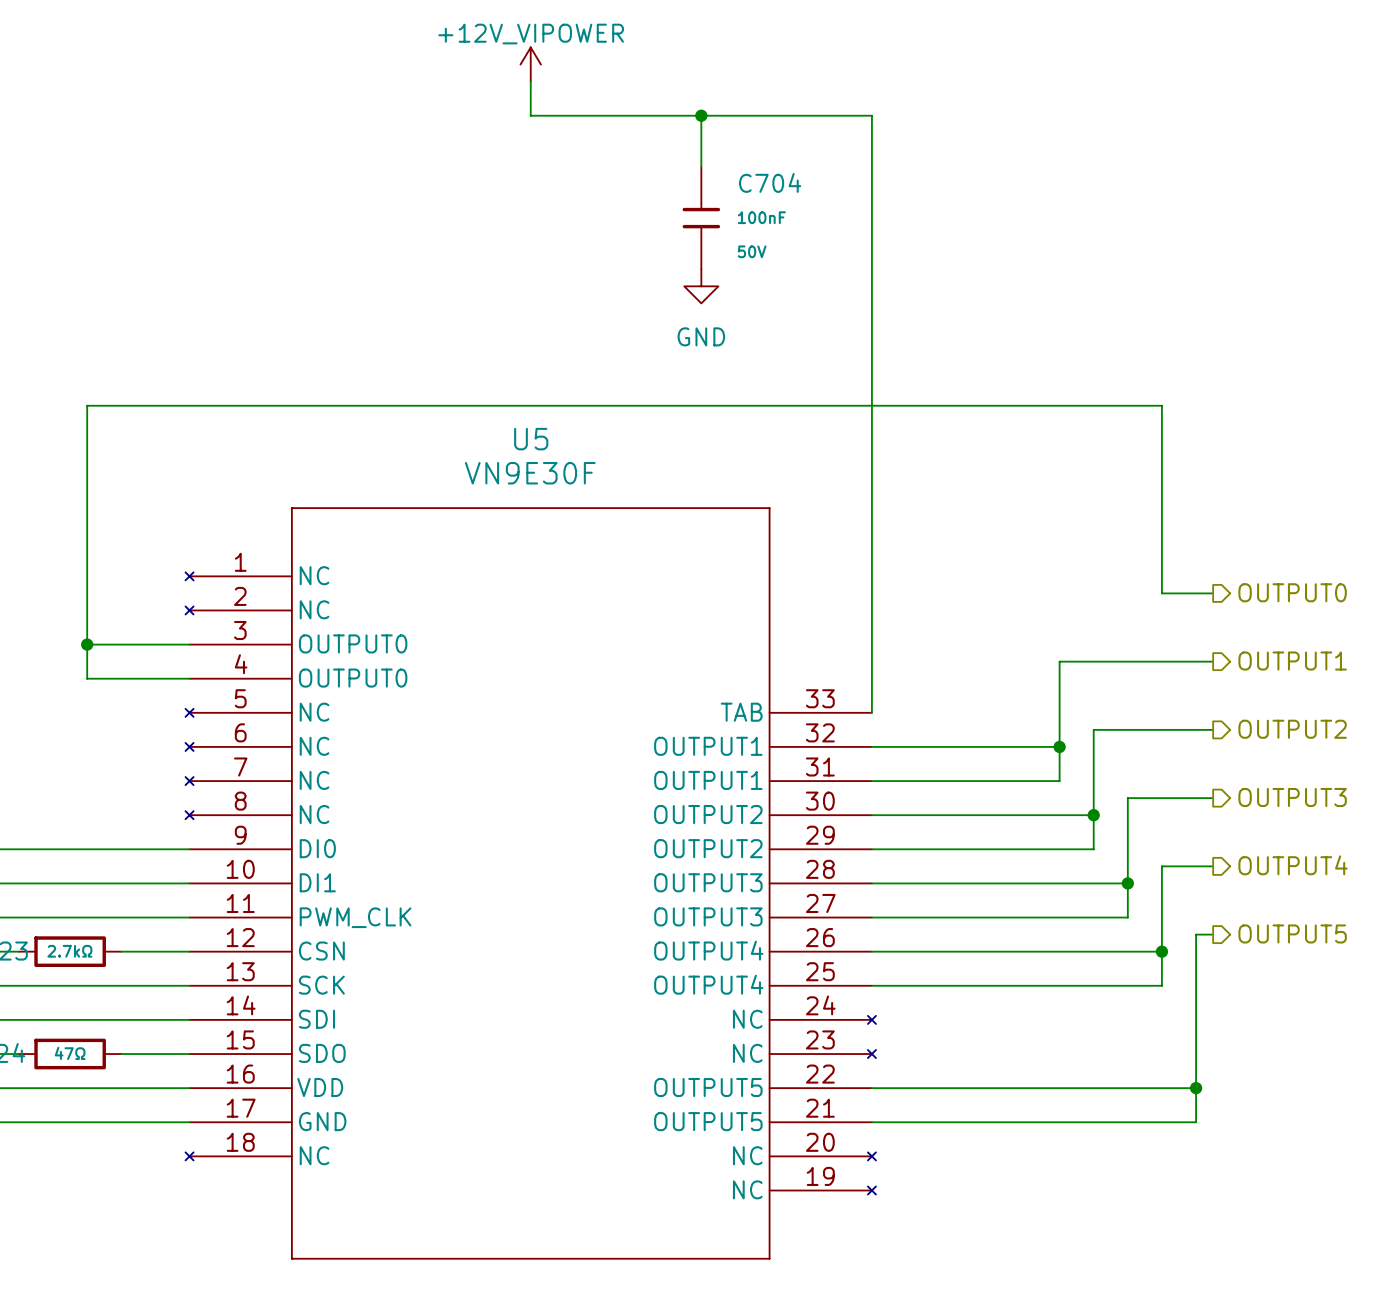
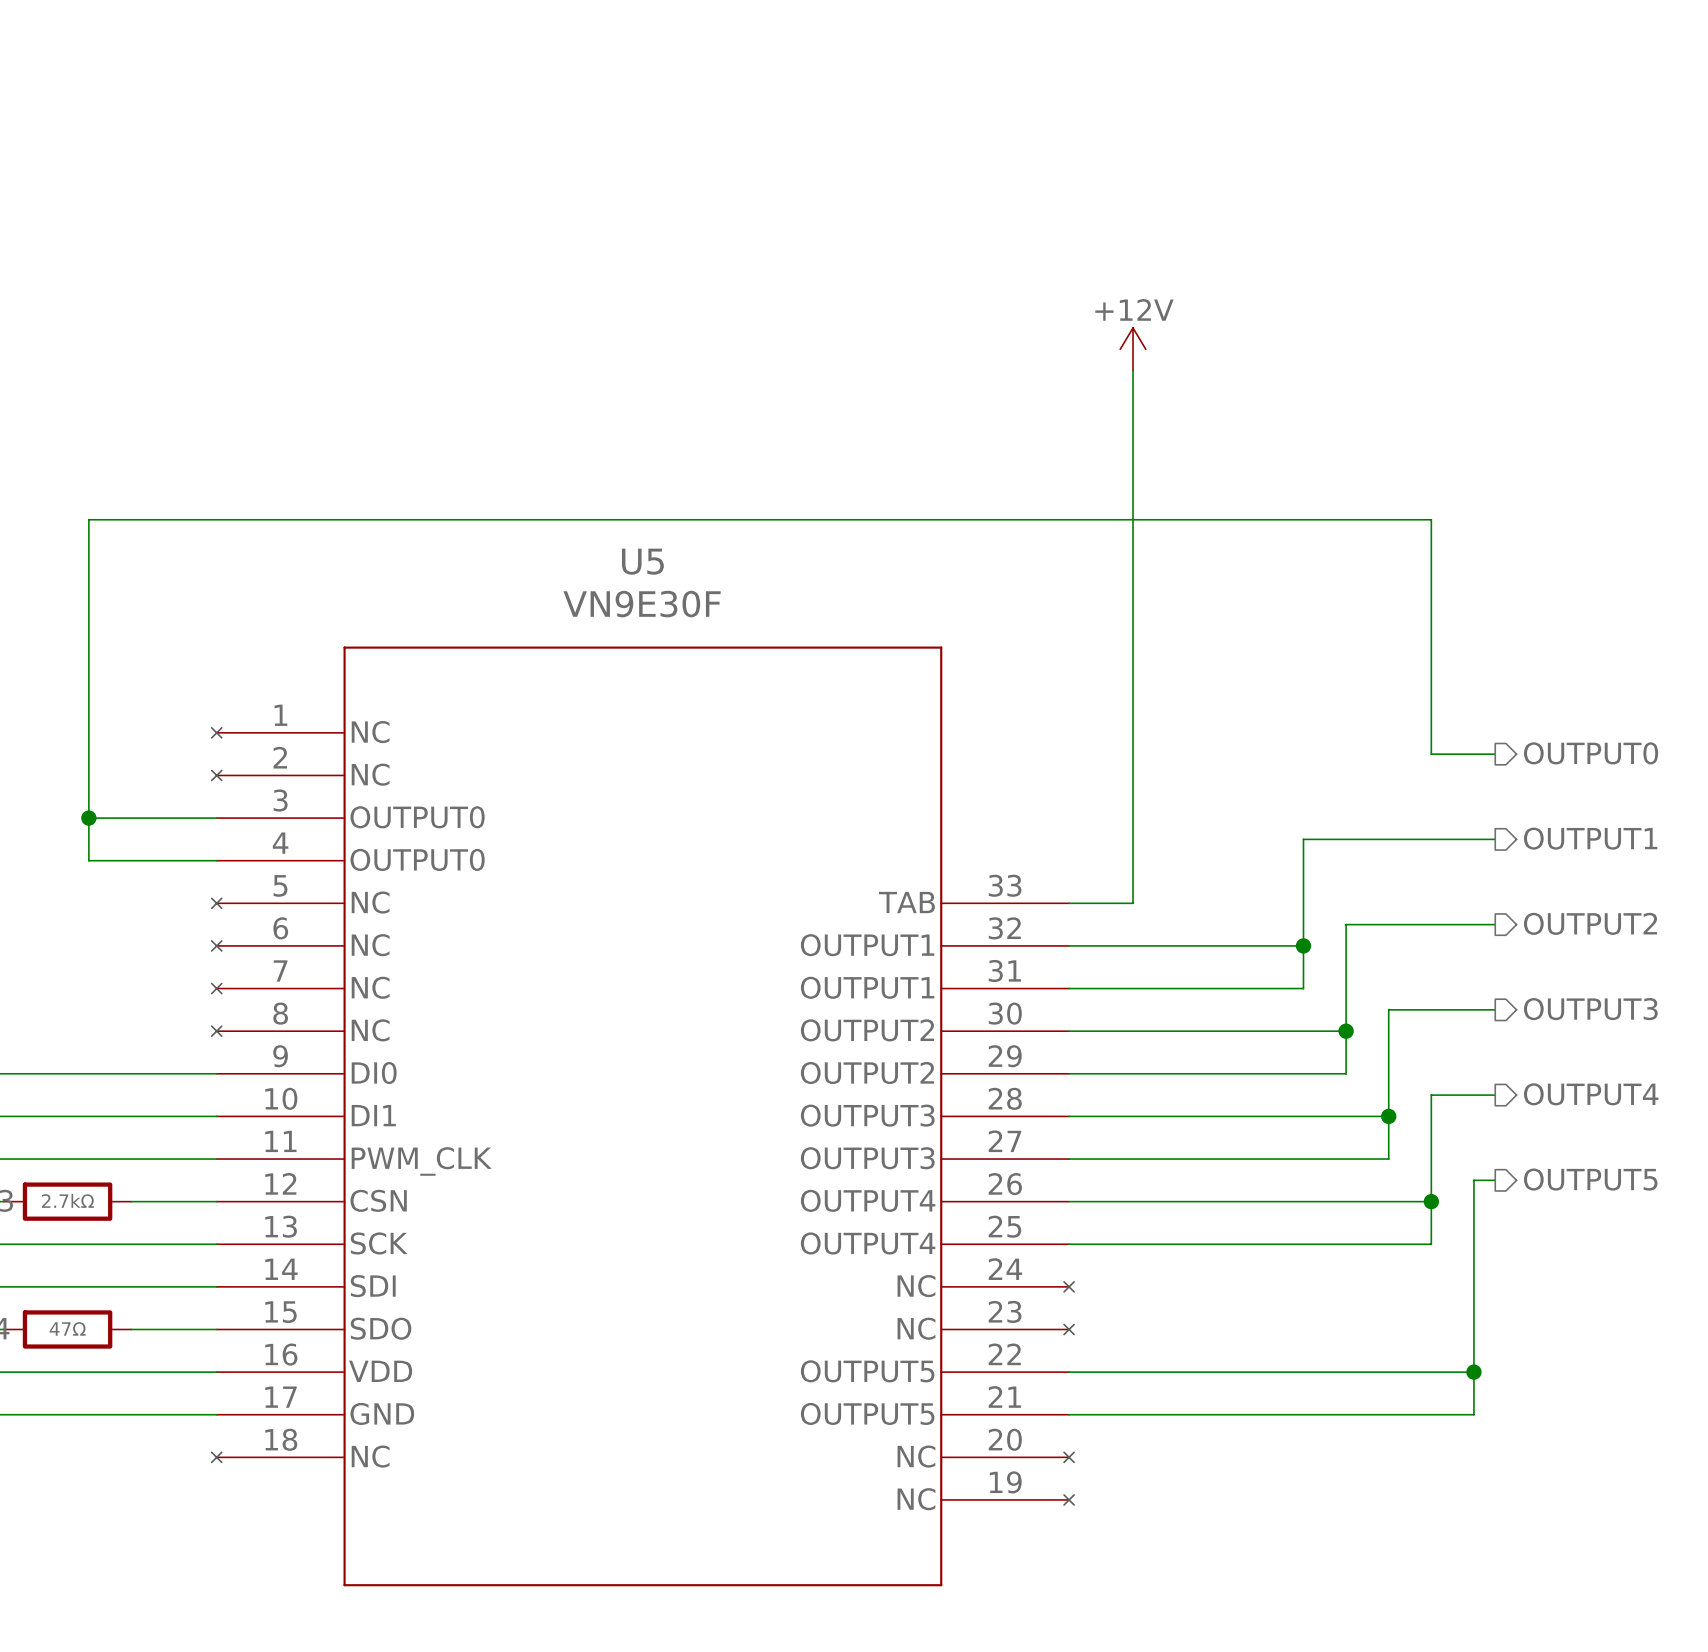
power symbol: +12V_VIPOWER (530, 64) -> none
wire: (530, 81) (530, 115) (871, 115) (871, 712) -> (1133, 370) (1133, 903) (1069, 903)
wire: (701, 115) (701, 166) -> none
junction: (701, 115) -> none
C704: 100nF (701, 218) -> none
power symbol: none -> +12V (1133, 349)
power symbol: GND (701, 286) -> none

